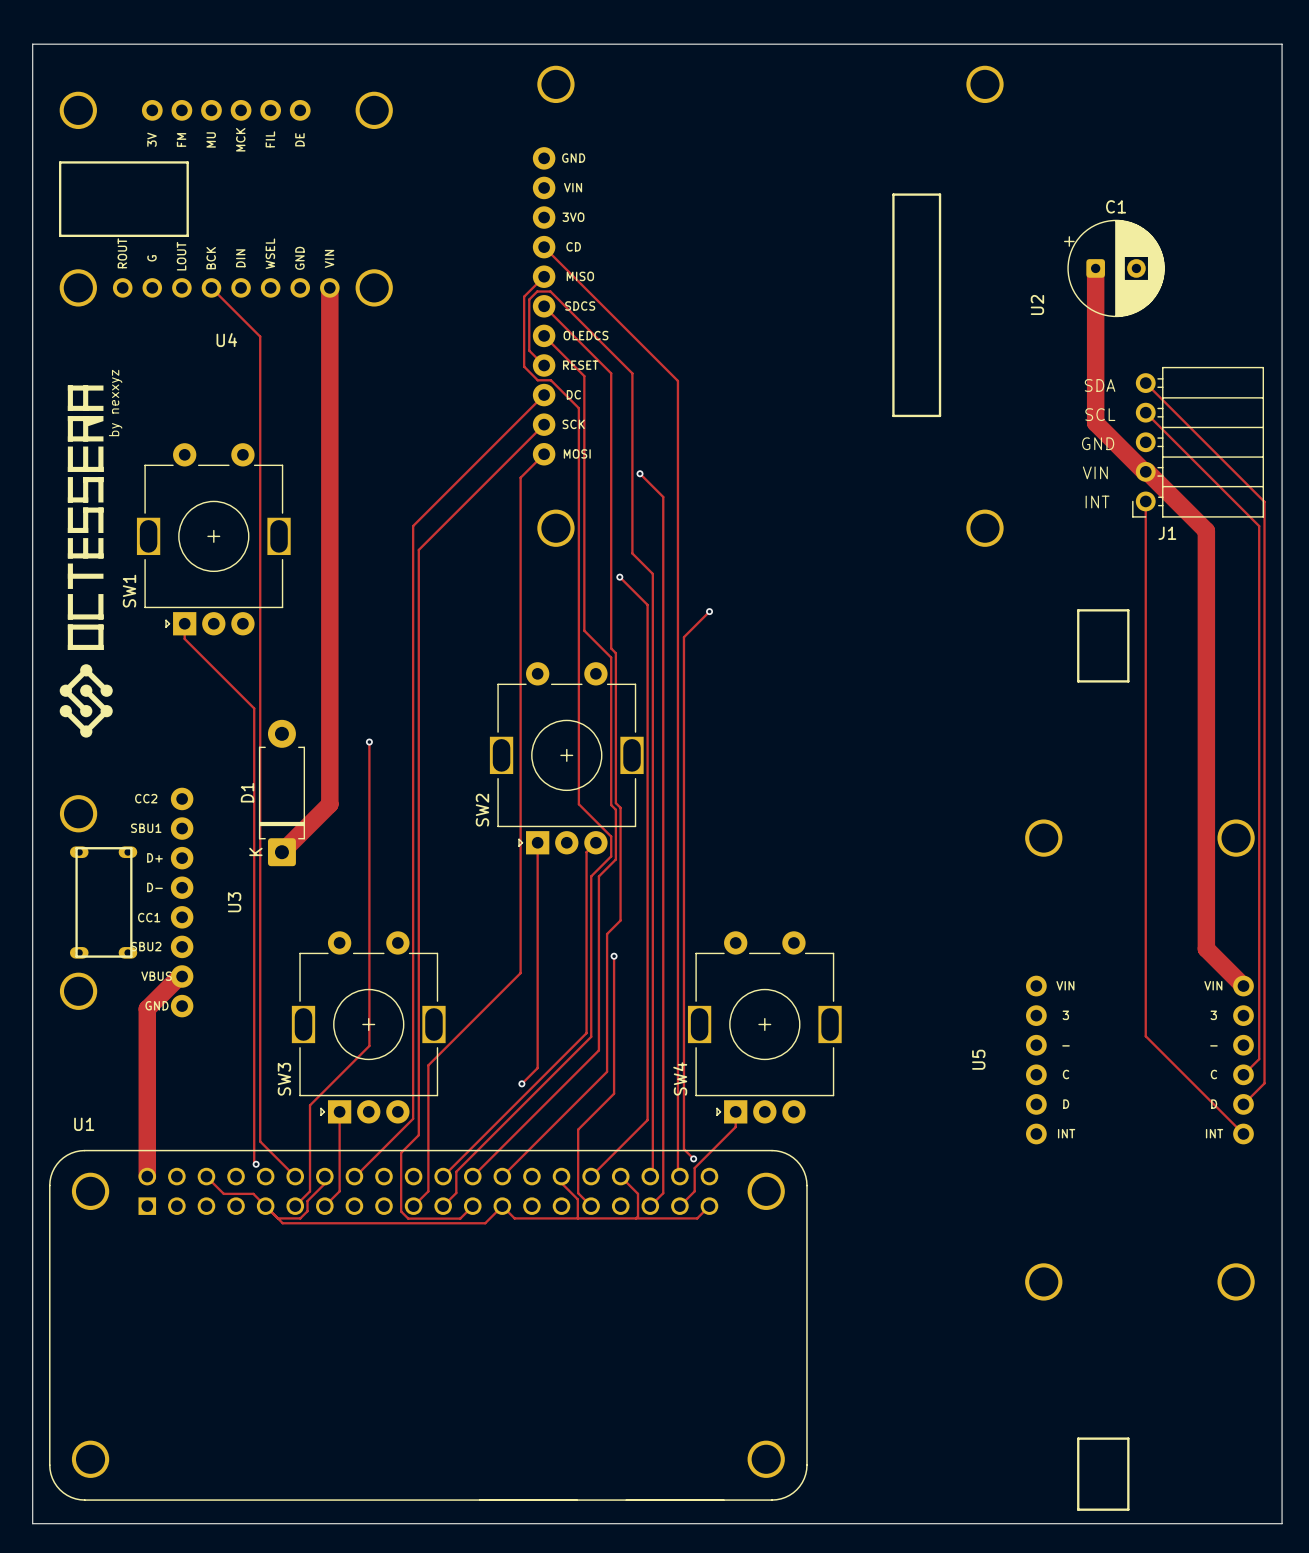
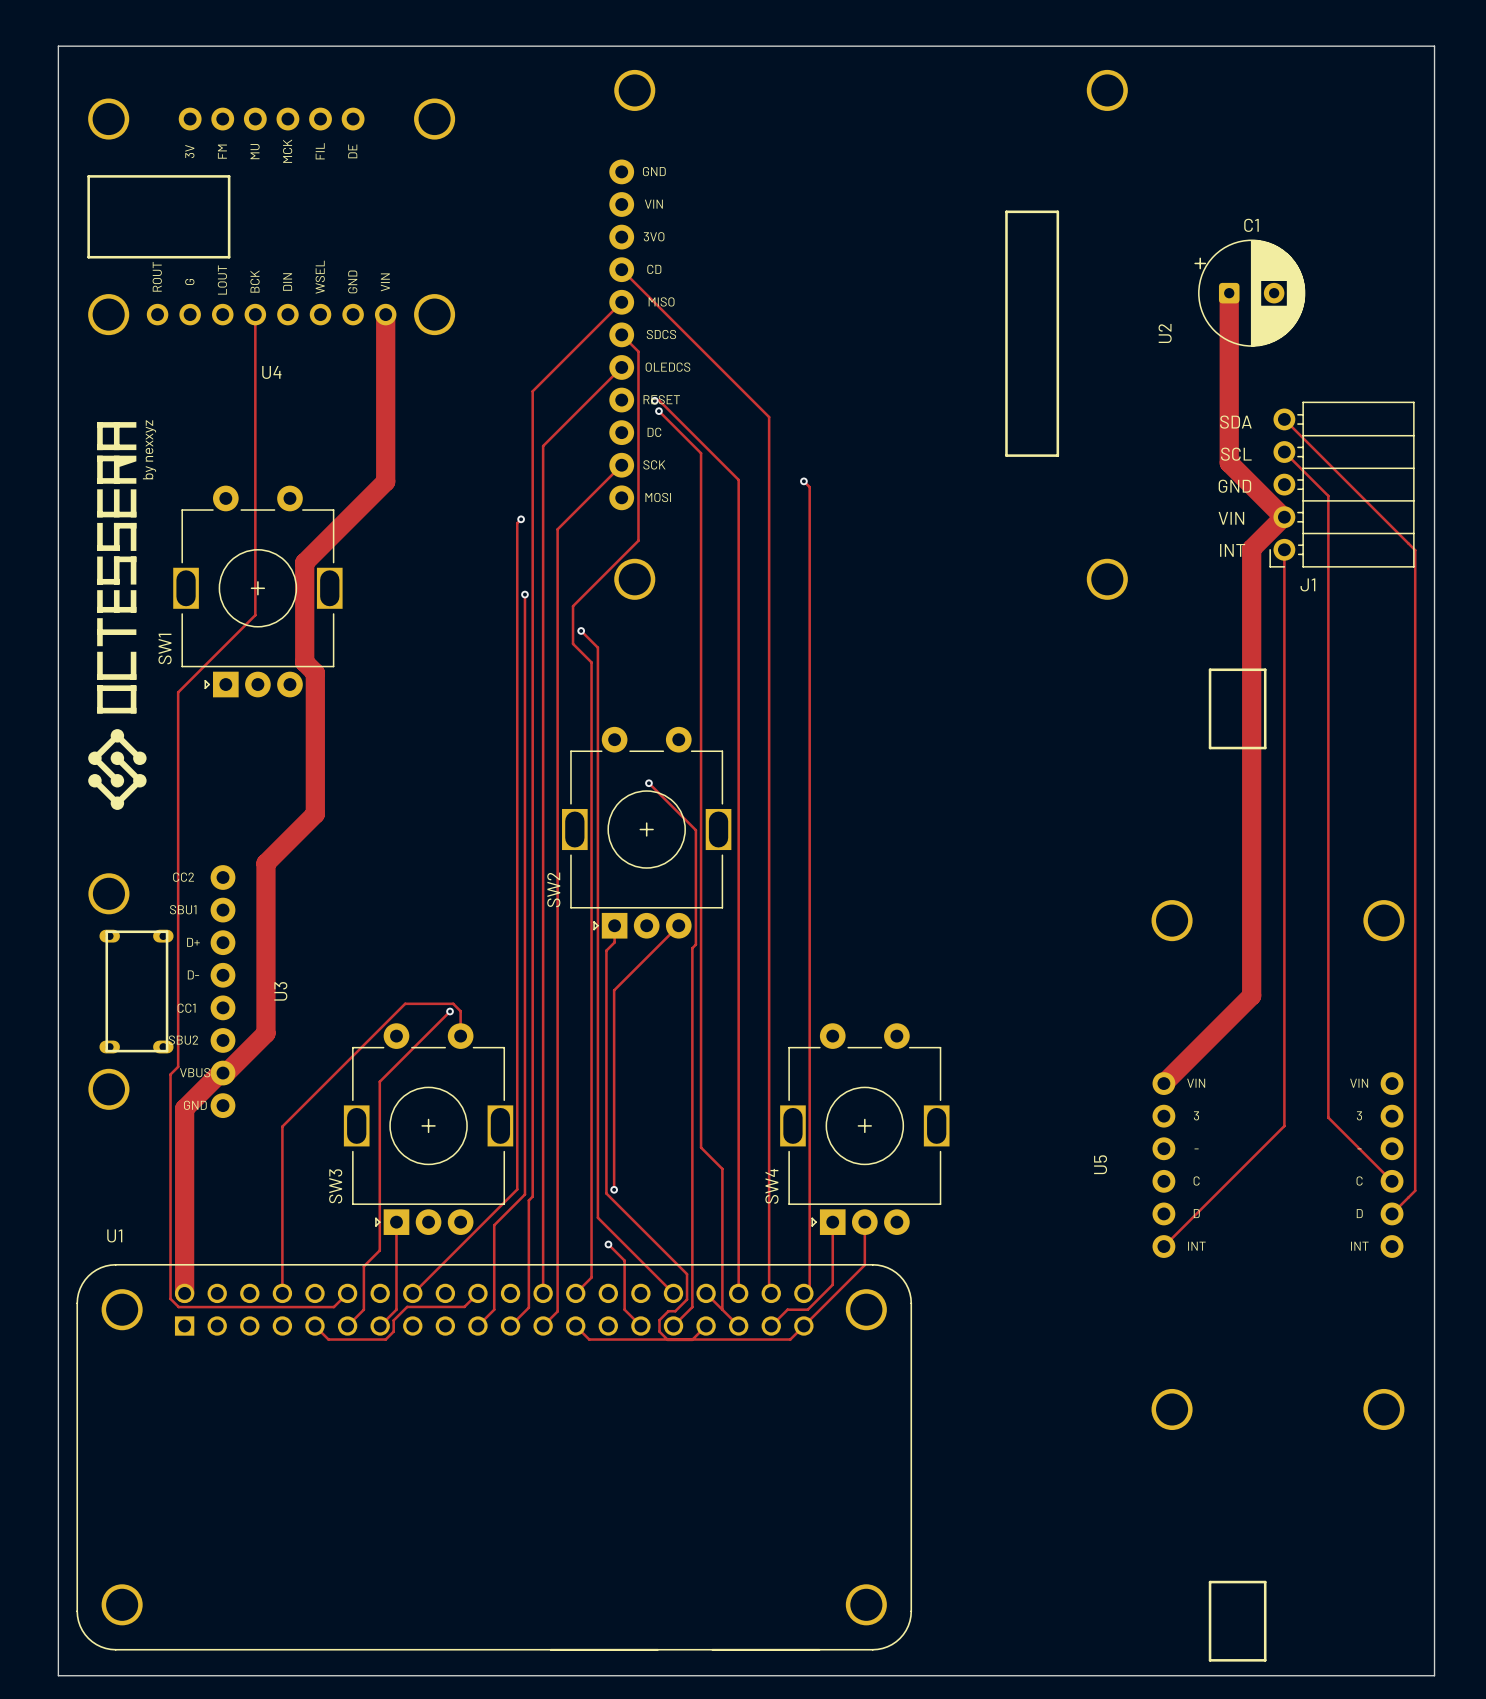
track: (211, 287) (260, 336) (260, 1141) (295, 1176) -> (255, 314) (255, 615) (178, 692) (178, 1066) (170, 1074) (170, 1298) (178, 1307) (333, 1307) (347, 1293)
track: (524, 296) (524, 366) (537, 380) (550, 380) (578, 408) (578, 804) (611, 836) (611, 856) (591, 876) (591, 1036) (456, 1171) (456, 1193) -> (599, 324) (532, 391) (532, 1196) (528, 1200) (528, 1307) (525, 1311)
track: (559, 321) (611, 373) (611, 648) (615, 653) (615, 803) (620, 807) (620, 920) (607, 934) (607, 1071) (516, 1162) -> (638, 351) (638, 540) (573, 606) (573, 643) (591, 662) (591, 1277)
track: (544, 335) (584, 376) (584, 630) (611, 657) (611, 805) (615, 809) (615, 859) (598, 876) (598, 1050) (472, 1176) -> (621, 367) (543, 446) (543, 1293)
track: (544, 365) (529, 350) (529, 299) (537, 291) (550, 291) (632, 373) (632, 553) (652, 573) (652, 1174) (650, 1176) -> (654, 400) (659, 400) (738, 479) (738, 1293)
via: none -> (654, 400)
track: none -> (658, 411) (701, 453) (701, 1147) (722, 1168) (722, 1309)
via: none -> (658, 411)
track: (544, 395) (413, 526) (413, 1118) (354, 1176) -> (521, 519) (517, 523) (517, 1189) (413, 1293)
track: (1095, 422) (1144, 471) -> (1229, 462) (1283, 517) (1251, 549) (1251, 995) (1163, 1083)
track: (329, 439) (329, 804) (281, 852) -> (385, 481) (304, 562) (304, 662) (315, 672) (315, 814) (265, 863) (265, 1033) (226, 1073) (223, 1073)
track: none -> (803, 481) (809, 487) (809, 1287) (803, 1293)
via: none -> (803, 481)
track: (1185, 452) (1259, 526) (1259, 1059) (1243, 1074) -> (1328, 495) (1328, 1117) (1392, 1181)
track: (544, 454) (520, 477) (520, 973) (428, 1065) (428, 1114) -> (524, 594) (524, 1194) (494, 1225)
track: (1145, 471) (1206, 530) (1206, 948) (1243, 986) -> none
via: none -> (521, 519)
track: (640, 473) (663, 497) (663, 1193) (650, 1206) -> none
via: (640, 473) -> none
track: (485, 482) (418, 549) (418, 1135) (401, 1152) (401, 1211) (408, 1218) (460, 1218) (472, 1206) -> (557, 529) (557, 1311) (543, 1326)
via: none -> (524, 594)
via: none -> (581, 630)
track: (619, 577) (647, 604) (647, 1120) (591, 1176) -> (581, 630) (597, 647) (597, 1217) (673, 1293)
via: (619, 577) -> none
track: (709, 611) (683, 637) (683, 1149) (693, 1158) -> none
via: (709, 611) -> none
track: (184, 623) (184, 638) (254, 708) (254, 1162) (256, 1164) -> none
via: none -> (648, 783)
track: (369, 742) (369, 1045) (310, 1105) (310, 1152) -> (450, 1011) (379, 1081) (379, 1250) (363, 1266)
via: (369, 742) -> none
D1: (281, 793) -> none
track: (586, 852) (586, 1033) (443, 1176) -> (668, 936) (614, 990) (614, 1189)
track: (537, 857) (537, 1068) (521, 1083) -> (614, 942) (606, 950) (606, 1193) (687, 1274) (687, 1299) (675, 1311) (668, 1311) (659, 1320) (659, 1331) (667, 1339) (692, 1339) (706, 1326)
via: none -> (450, 1011)
track: none -> (460, 1036) (460, 1011) (453, 1003) (405, 1003) (282, 1126) (282, 1293)
track: (614, 956) (614, 1093) (578, 1129) (578, 1193) (591, 1206) -> (648, 783) (695, 830) (695, 944) (692, 948) (692, 1307) (673, 1326)
via: (614, 956) -> none
track: (1145, 1024) (1145, 1036) (1243, 1133) -> (1284, 1126) (1163, 1246)
via position: (521, 1083) -> (614, 1189)
track: none -> (864, 1222) (864, 1265) (803, 1326)
track: (735, 1127) (694, 1168) (694, 1191) -> (832, 1238) (832, 1284) (807, 1309) (787, 1309)
track: none -> (608, 1244) (624, 1260) (624, 1309) (640, 1326)
via: none -> (608, 1244)
via: (693, 1158) -> none
via: (256, 1164) -> none
track: (206, 1176) (223, 1193) (253, 1193) (265, 1206) -> none
track: (324, 1176) (324, 1183) (307, 1201) (307, 1211) (300, 1218) -> (477, 1293) (464, 1306) (407, 1306) (393, 1320) (393, 1331) (385, 1339) (353, 1339)
track: (561, 1176) (561, 1183) (577, 1199) (577, 1218) -> none
track: (638, 1193) (638, 1216) (636, 1218) -> (725, 1312) (738, 1326)
track: (502, 1206) (485, 1223) (282, 1223) (277, 1218) -> none

